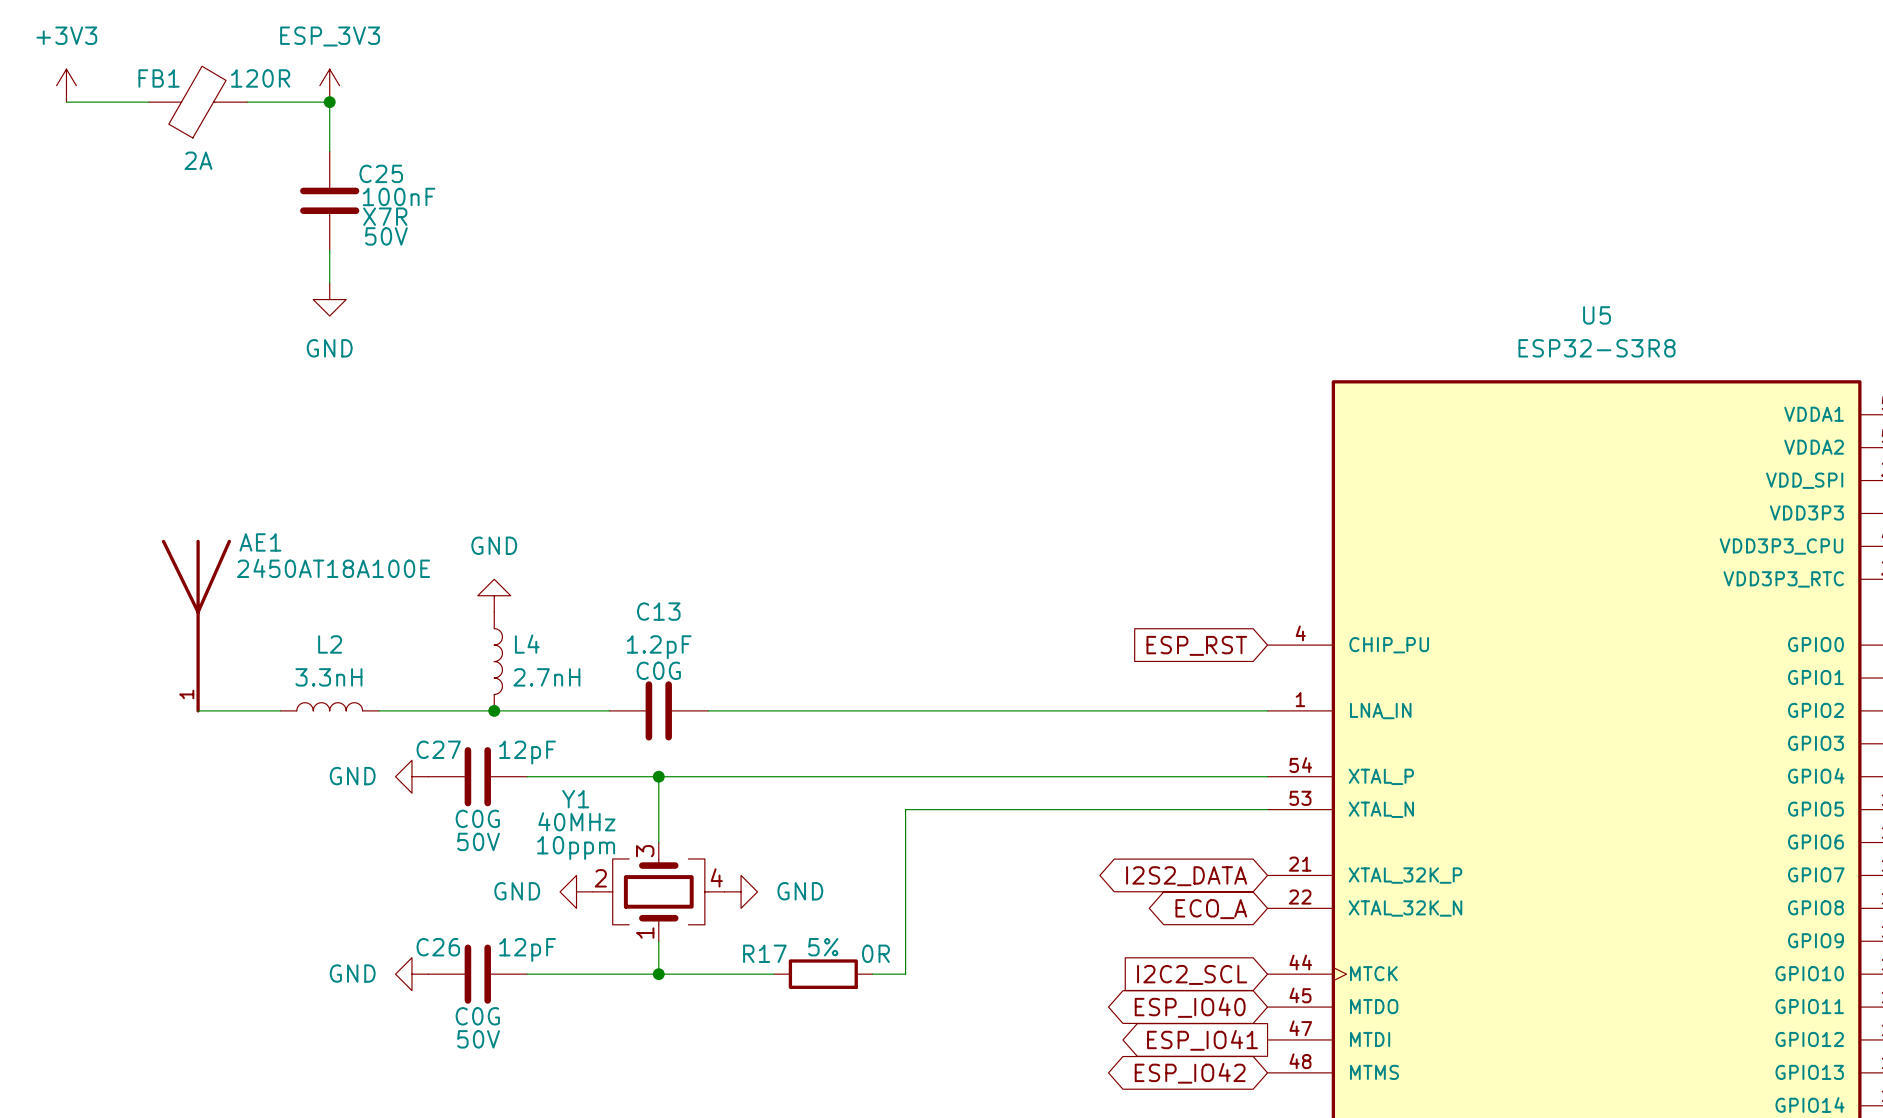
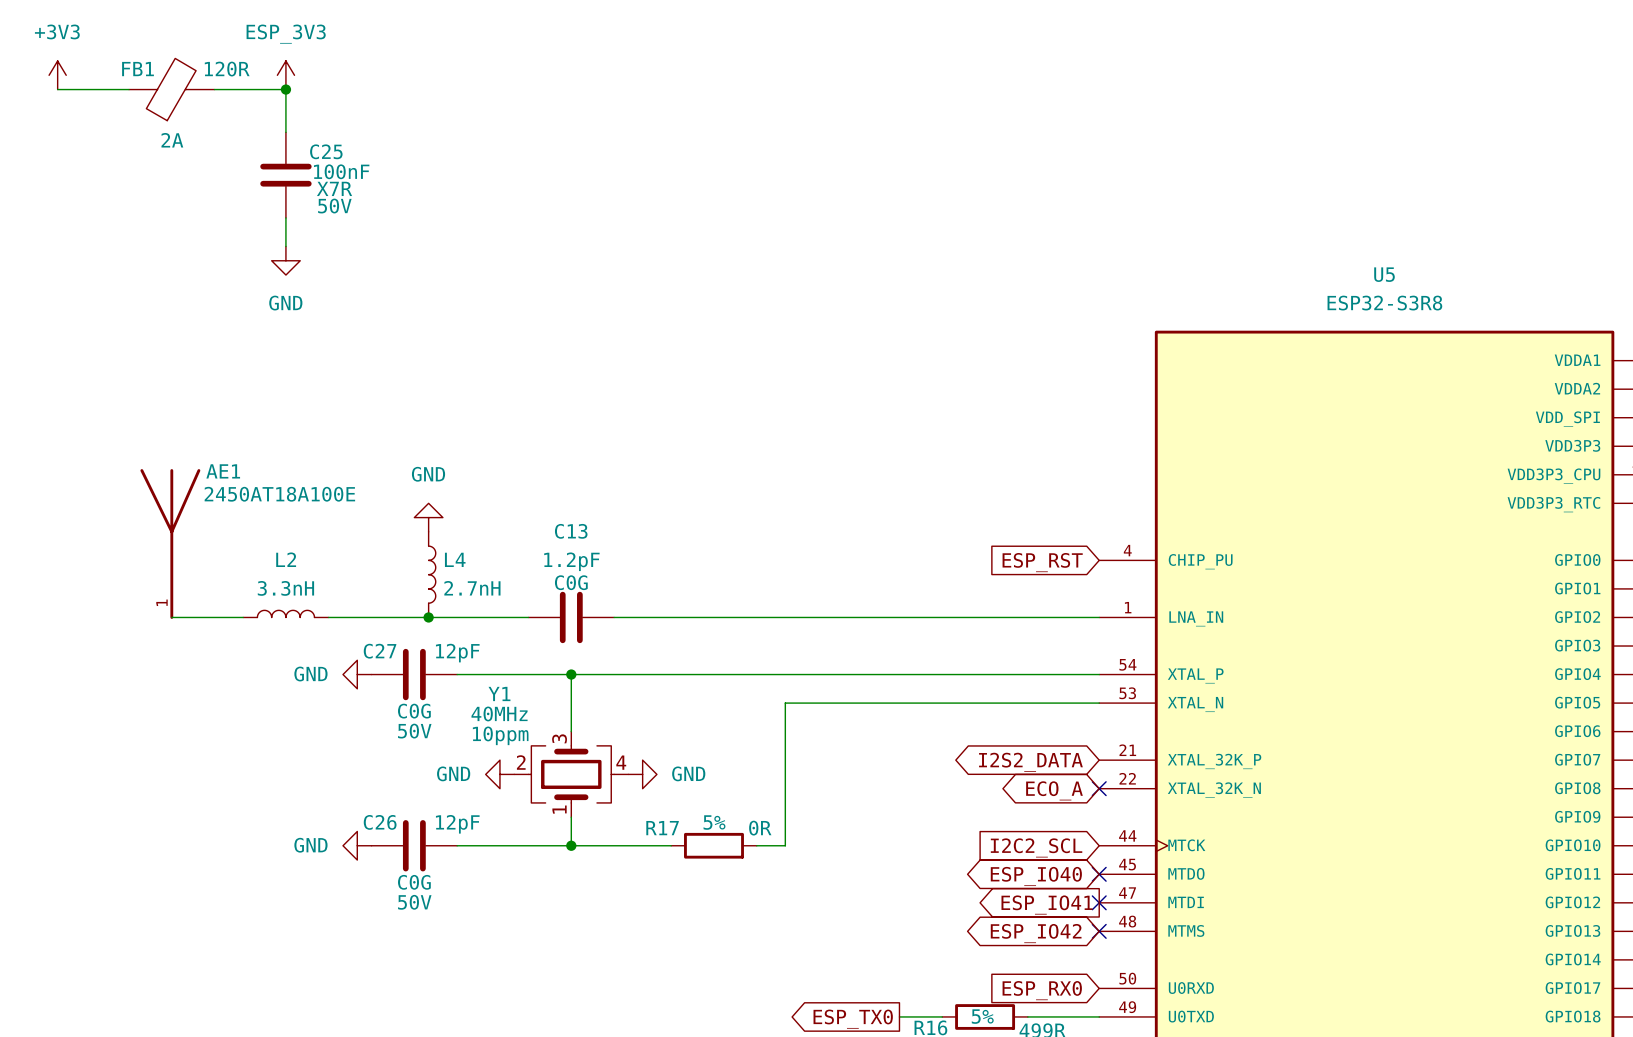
no-connect mark: none -> (1099, 788)
no-connect mark: none -> (1099, 874)
no-connect mark: none -> (1099, 902)
no-connect mark: none -> (1099, 931)

